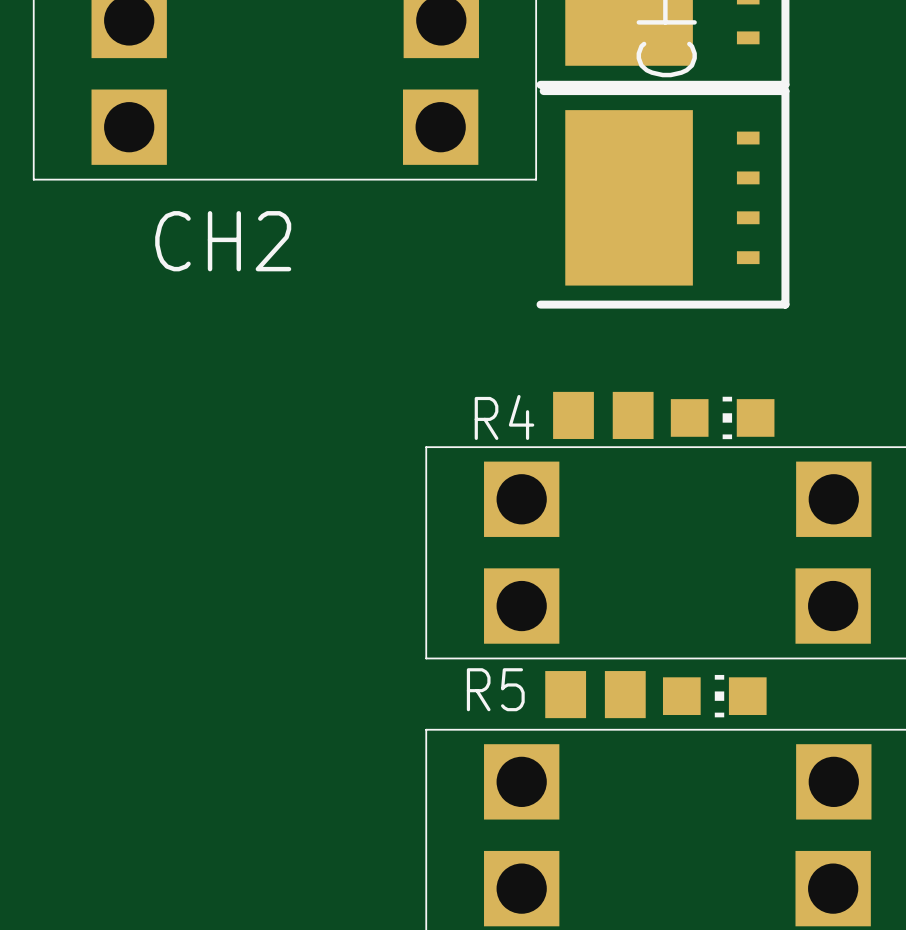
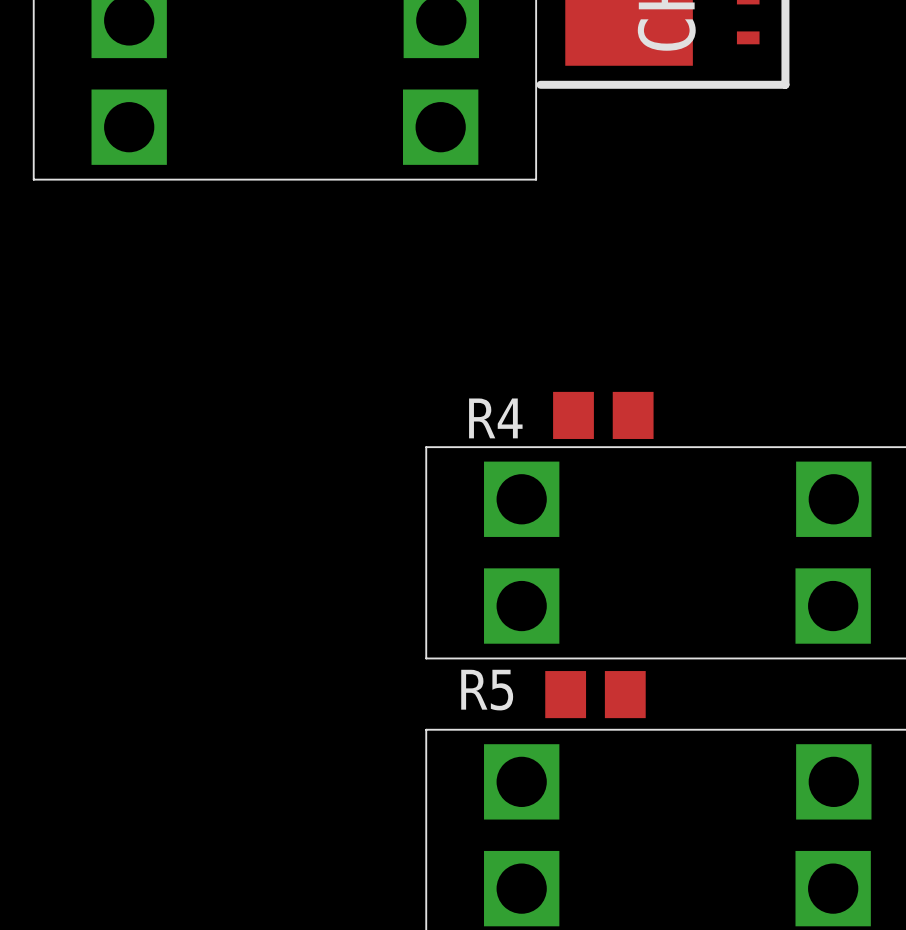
part: (662, 197) -> none
text: CH2 (223, 241) -> none
part: (722, 417) -> none
part: (714, 696) -> none

